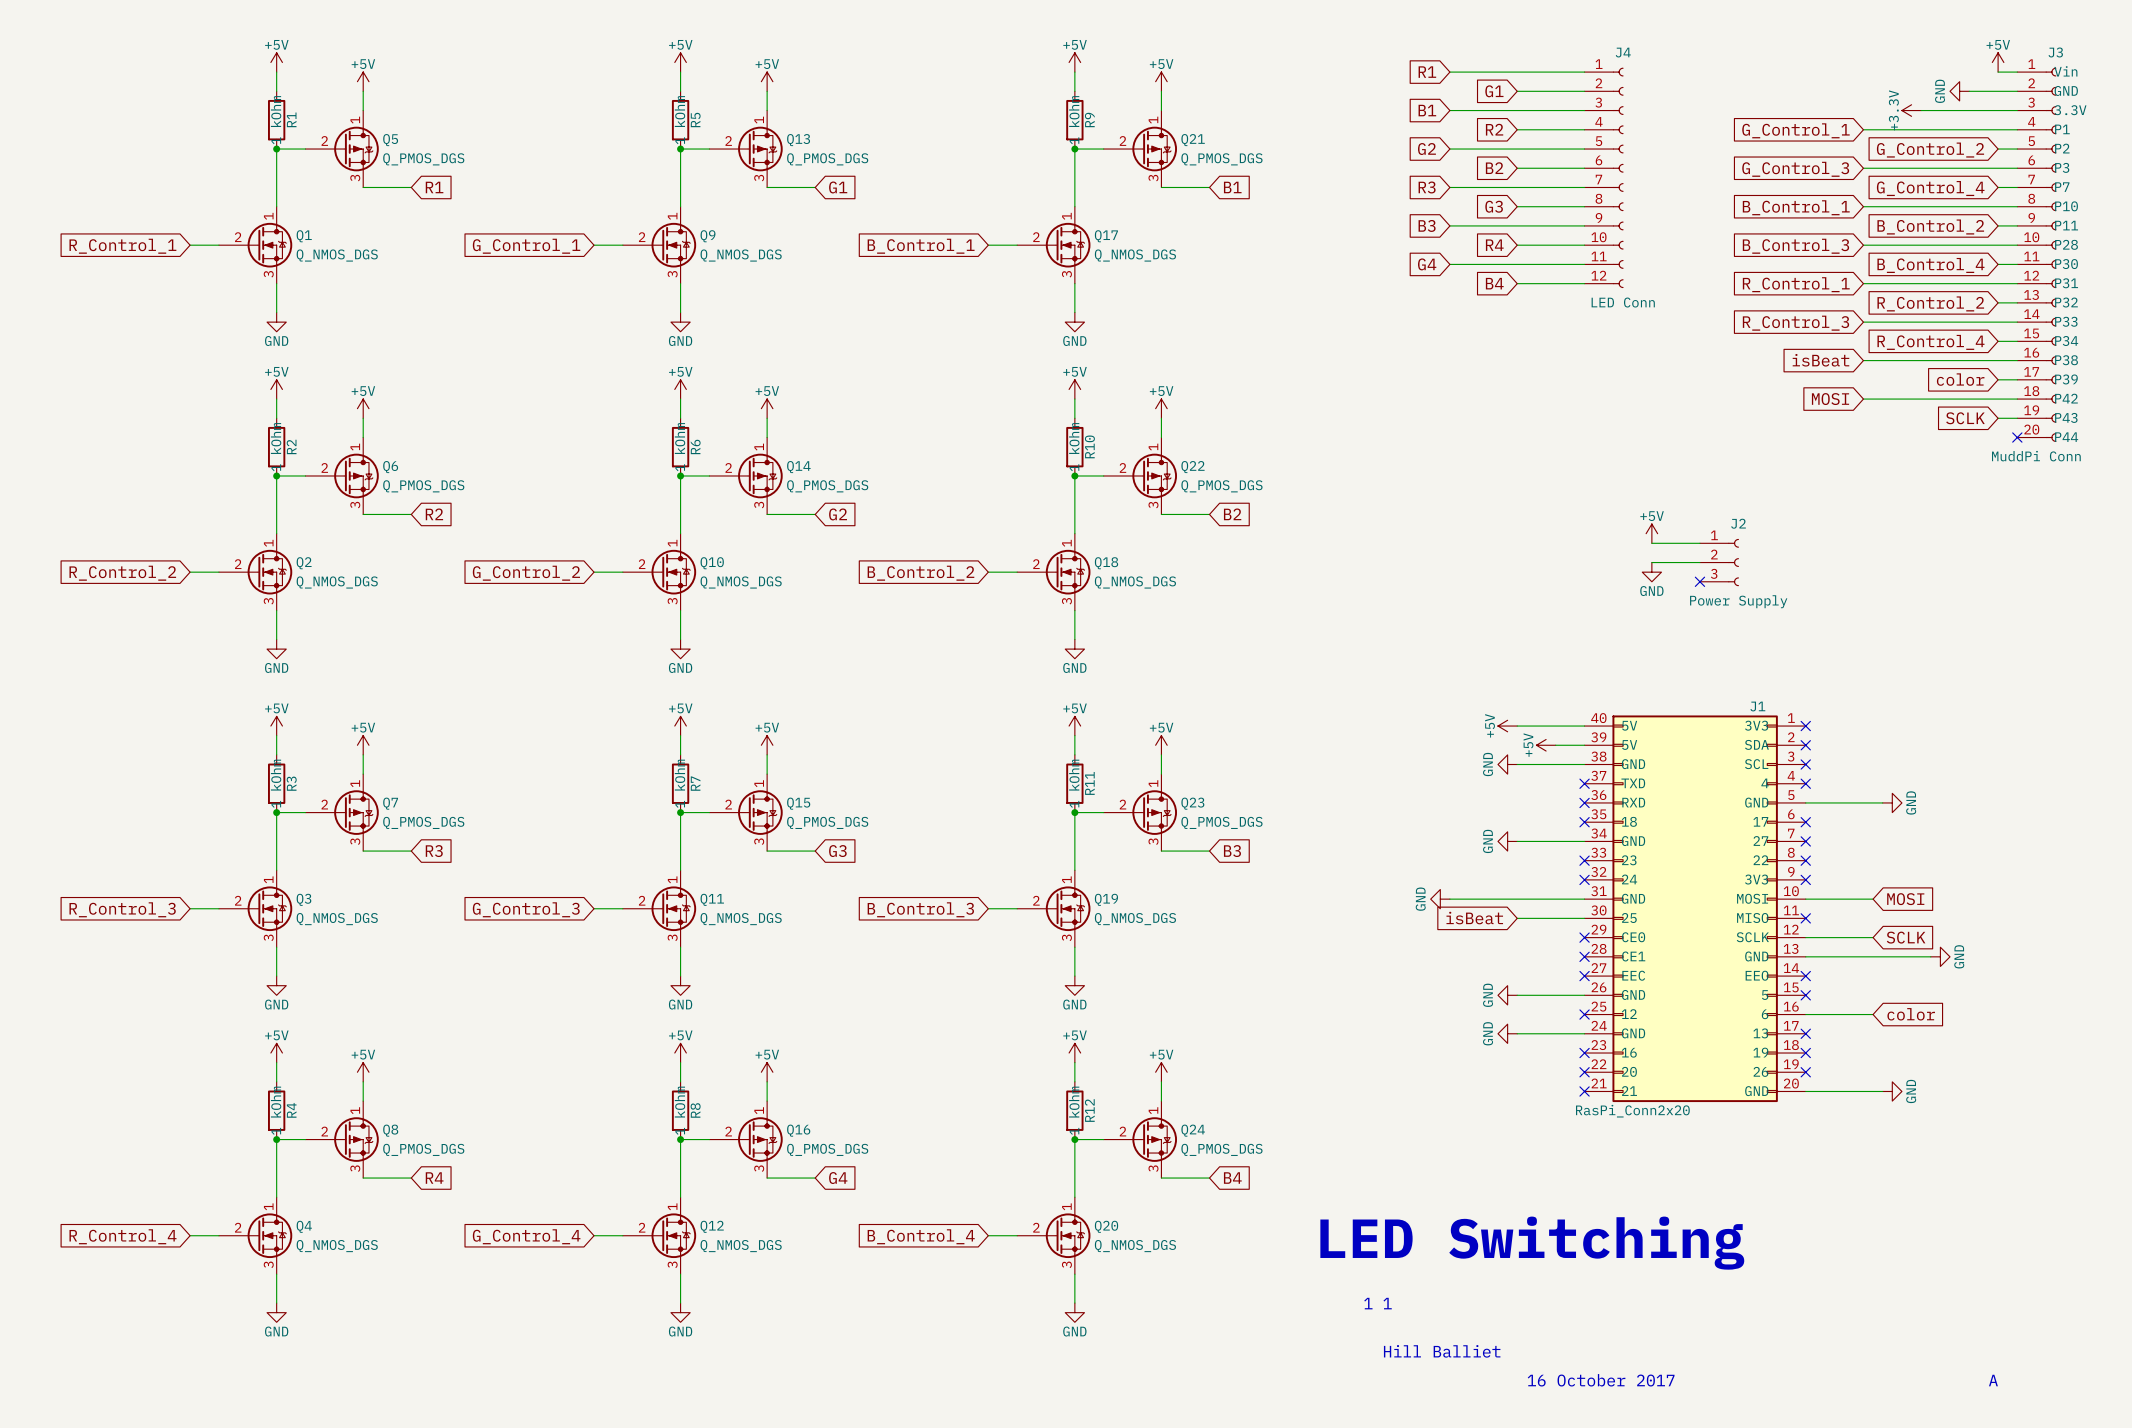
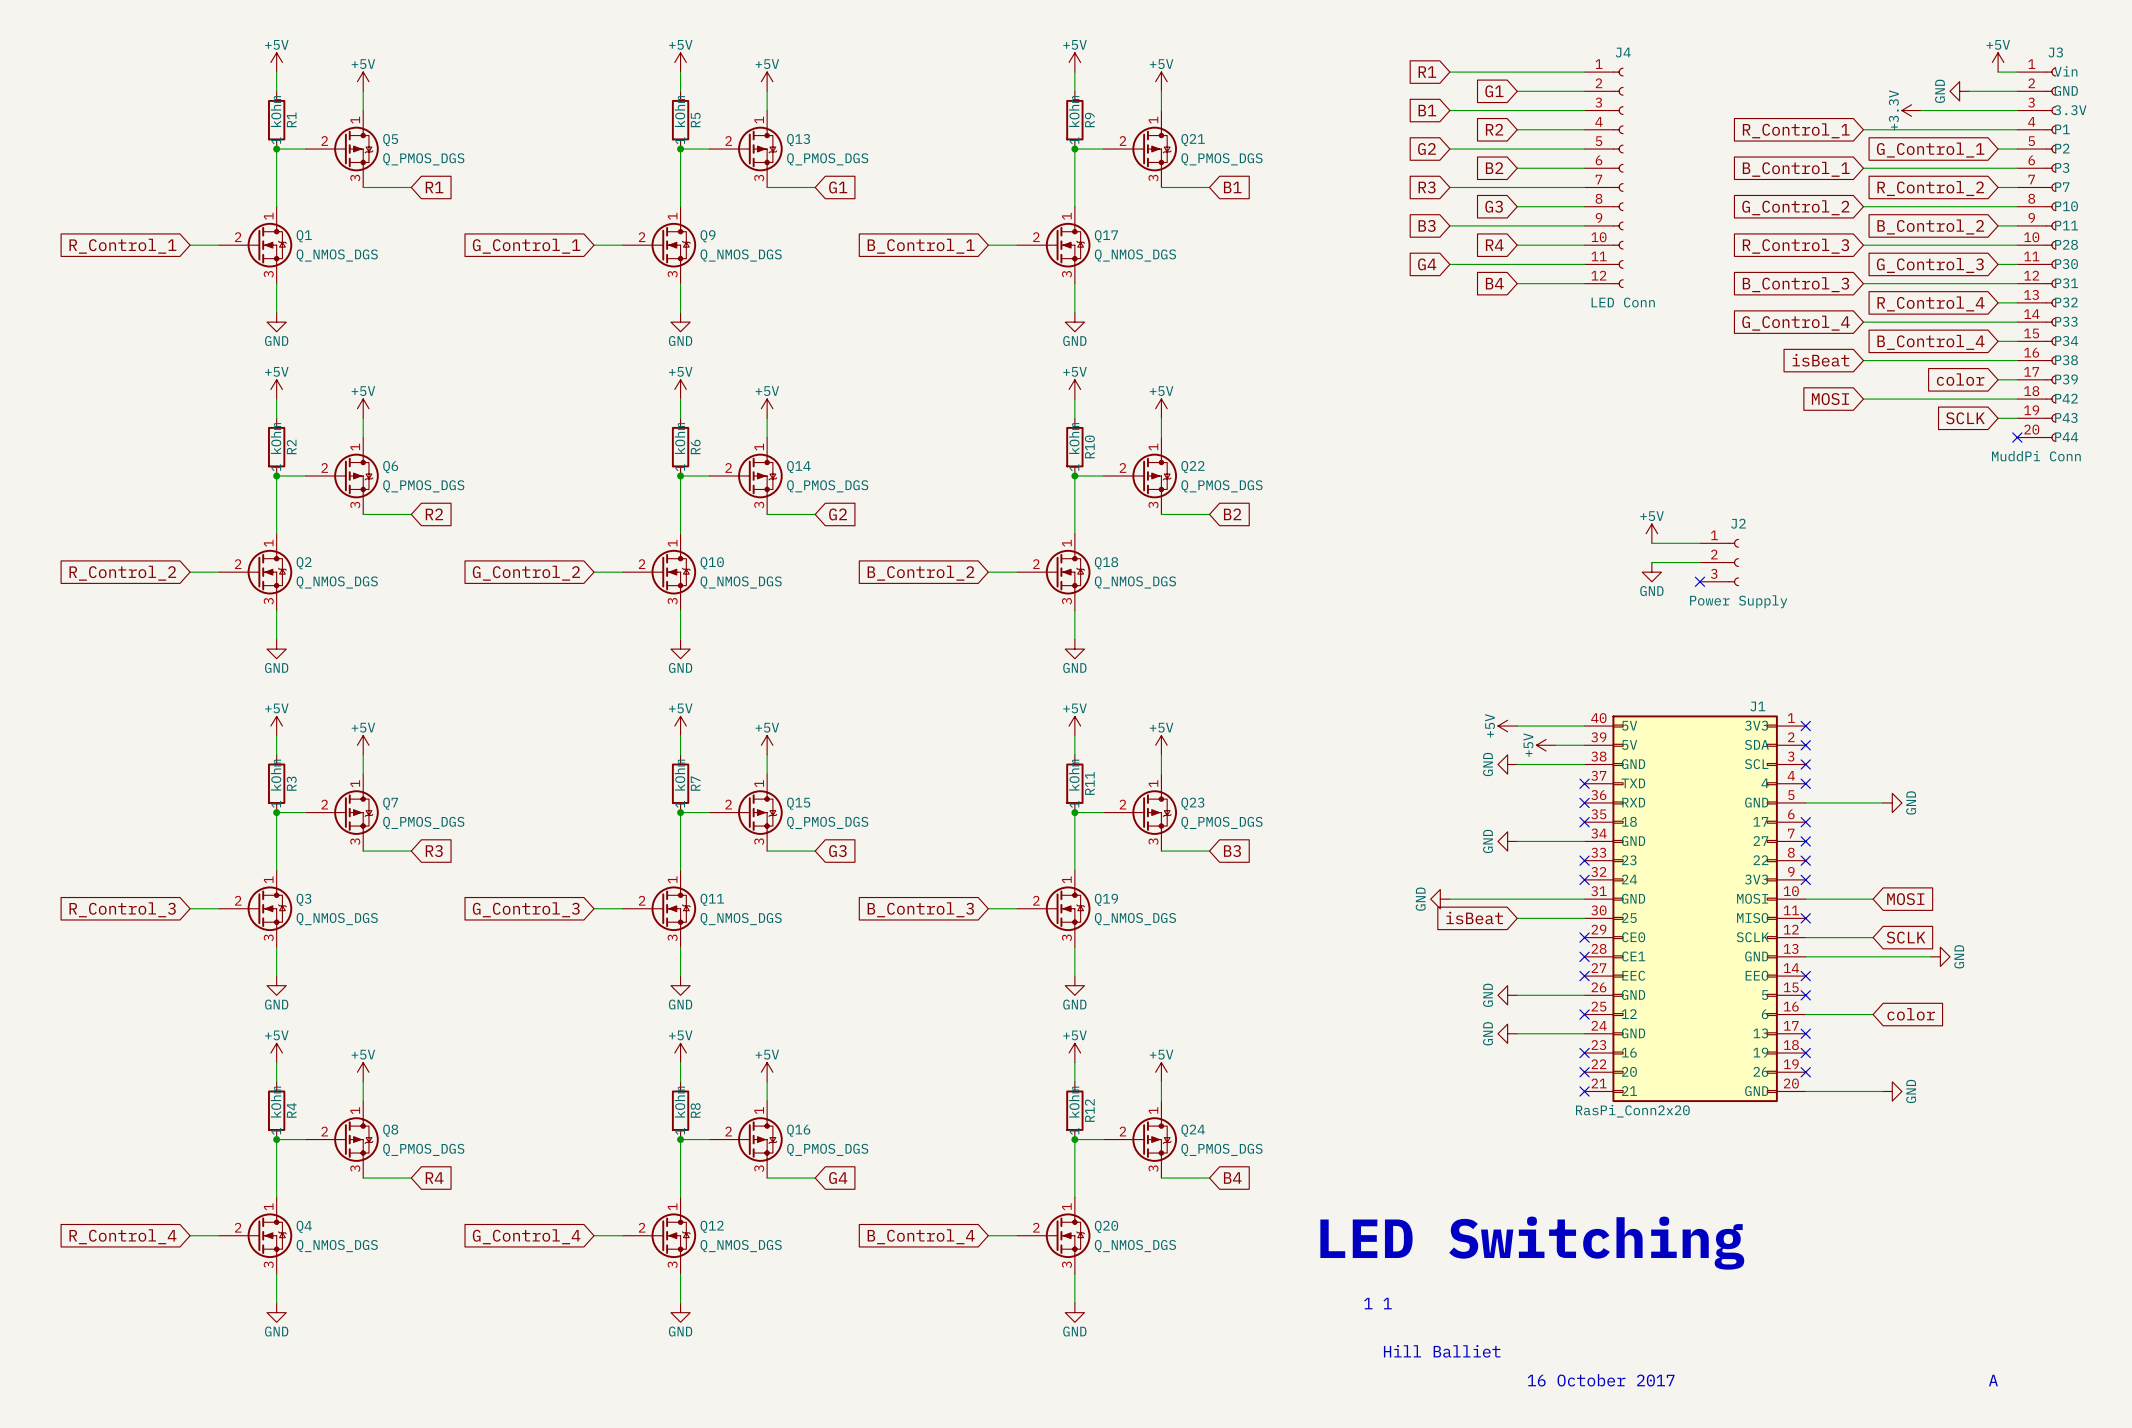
global label: G_Control_1 (1795, 130) -> R_Control_1 (1796, 130)
global label: G_Control_2 (1930, 150) -> G_Control_1 (1930, 150)
global label: G_Control_3 (1795, 169) -> B_Control_1 (1796, 169)
global label: G_Control_4 (1930, 188) -> R_Control_2 (1930, 188)
global label: B_Control_1 (1796, 207) -> G_Control_2 (1795, 207)
global label: B_Control_3 (1795, 246) -> R_Control_3 (1795, 246)
global label: B_Control_4 (1930, 265) -> G_Control_3 (1930, 265)
global label: R_Control_1 (1796, 284) -> B_Control_3 (1795, 284)
global label: R_Control_2 (1930, 303) -> R_Control_4 (1930, 303)
global label: R_Control_3 (1795, 323) -> G_Control_4 (1796, 323)
global label: R_Control_4 (1930, 342) -> B_Control_4 (1930, 342)

